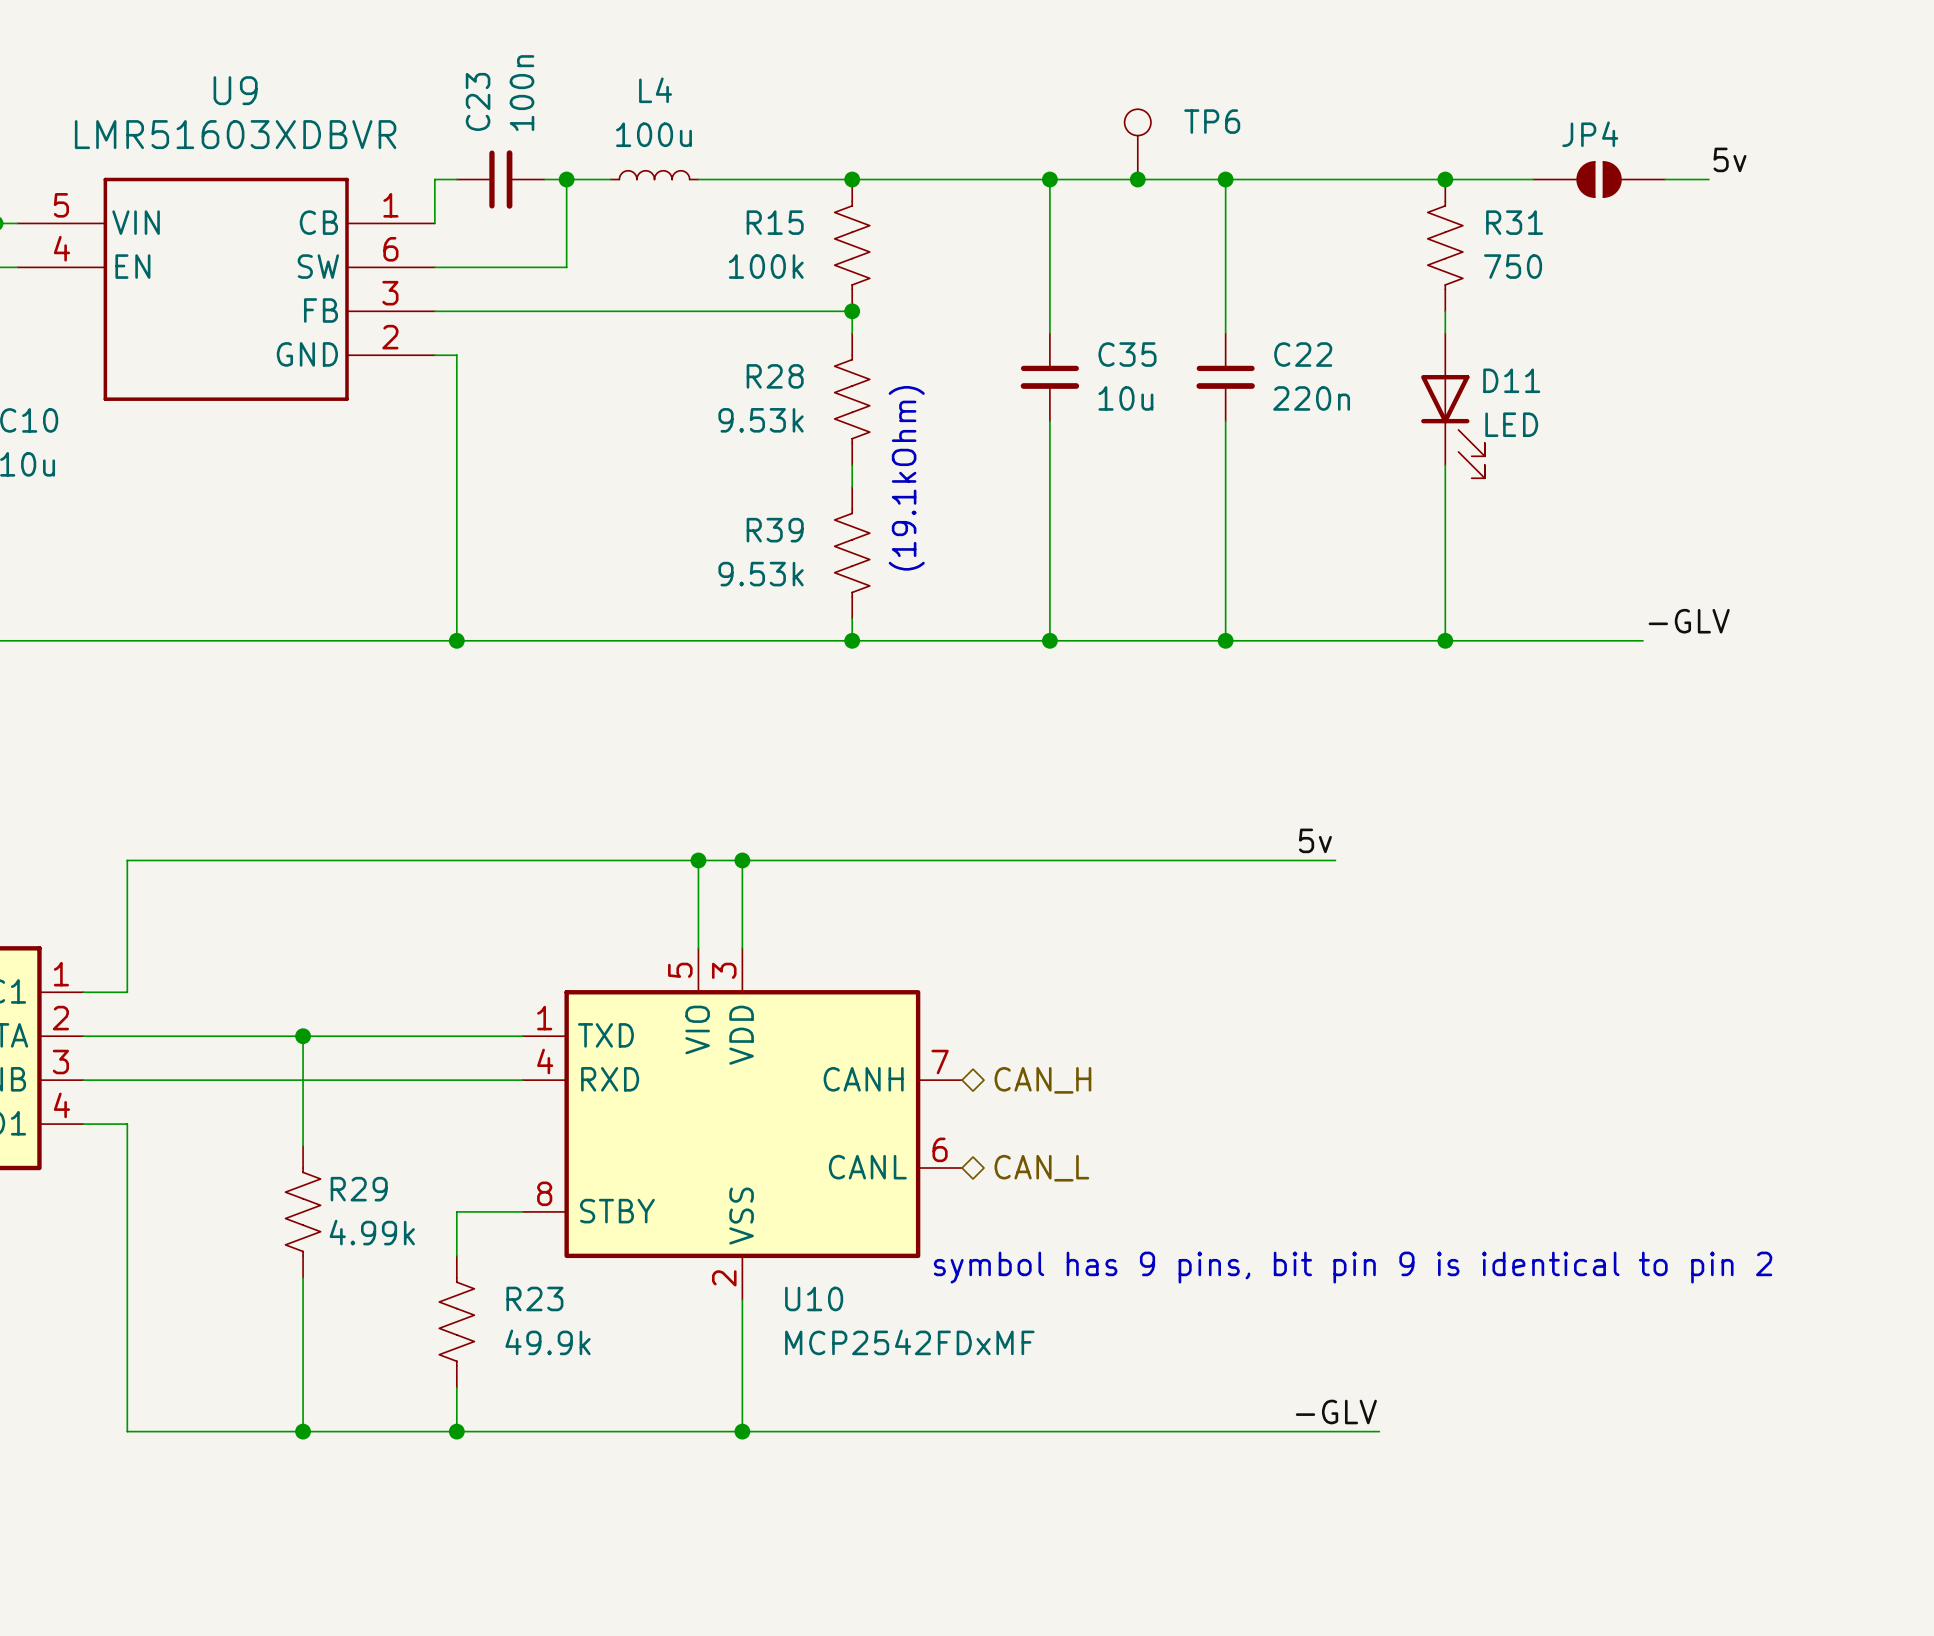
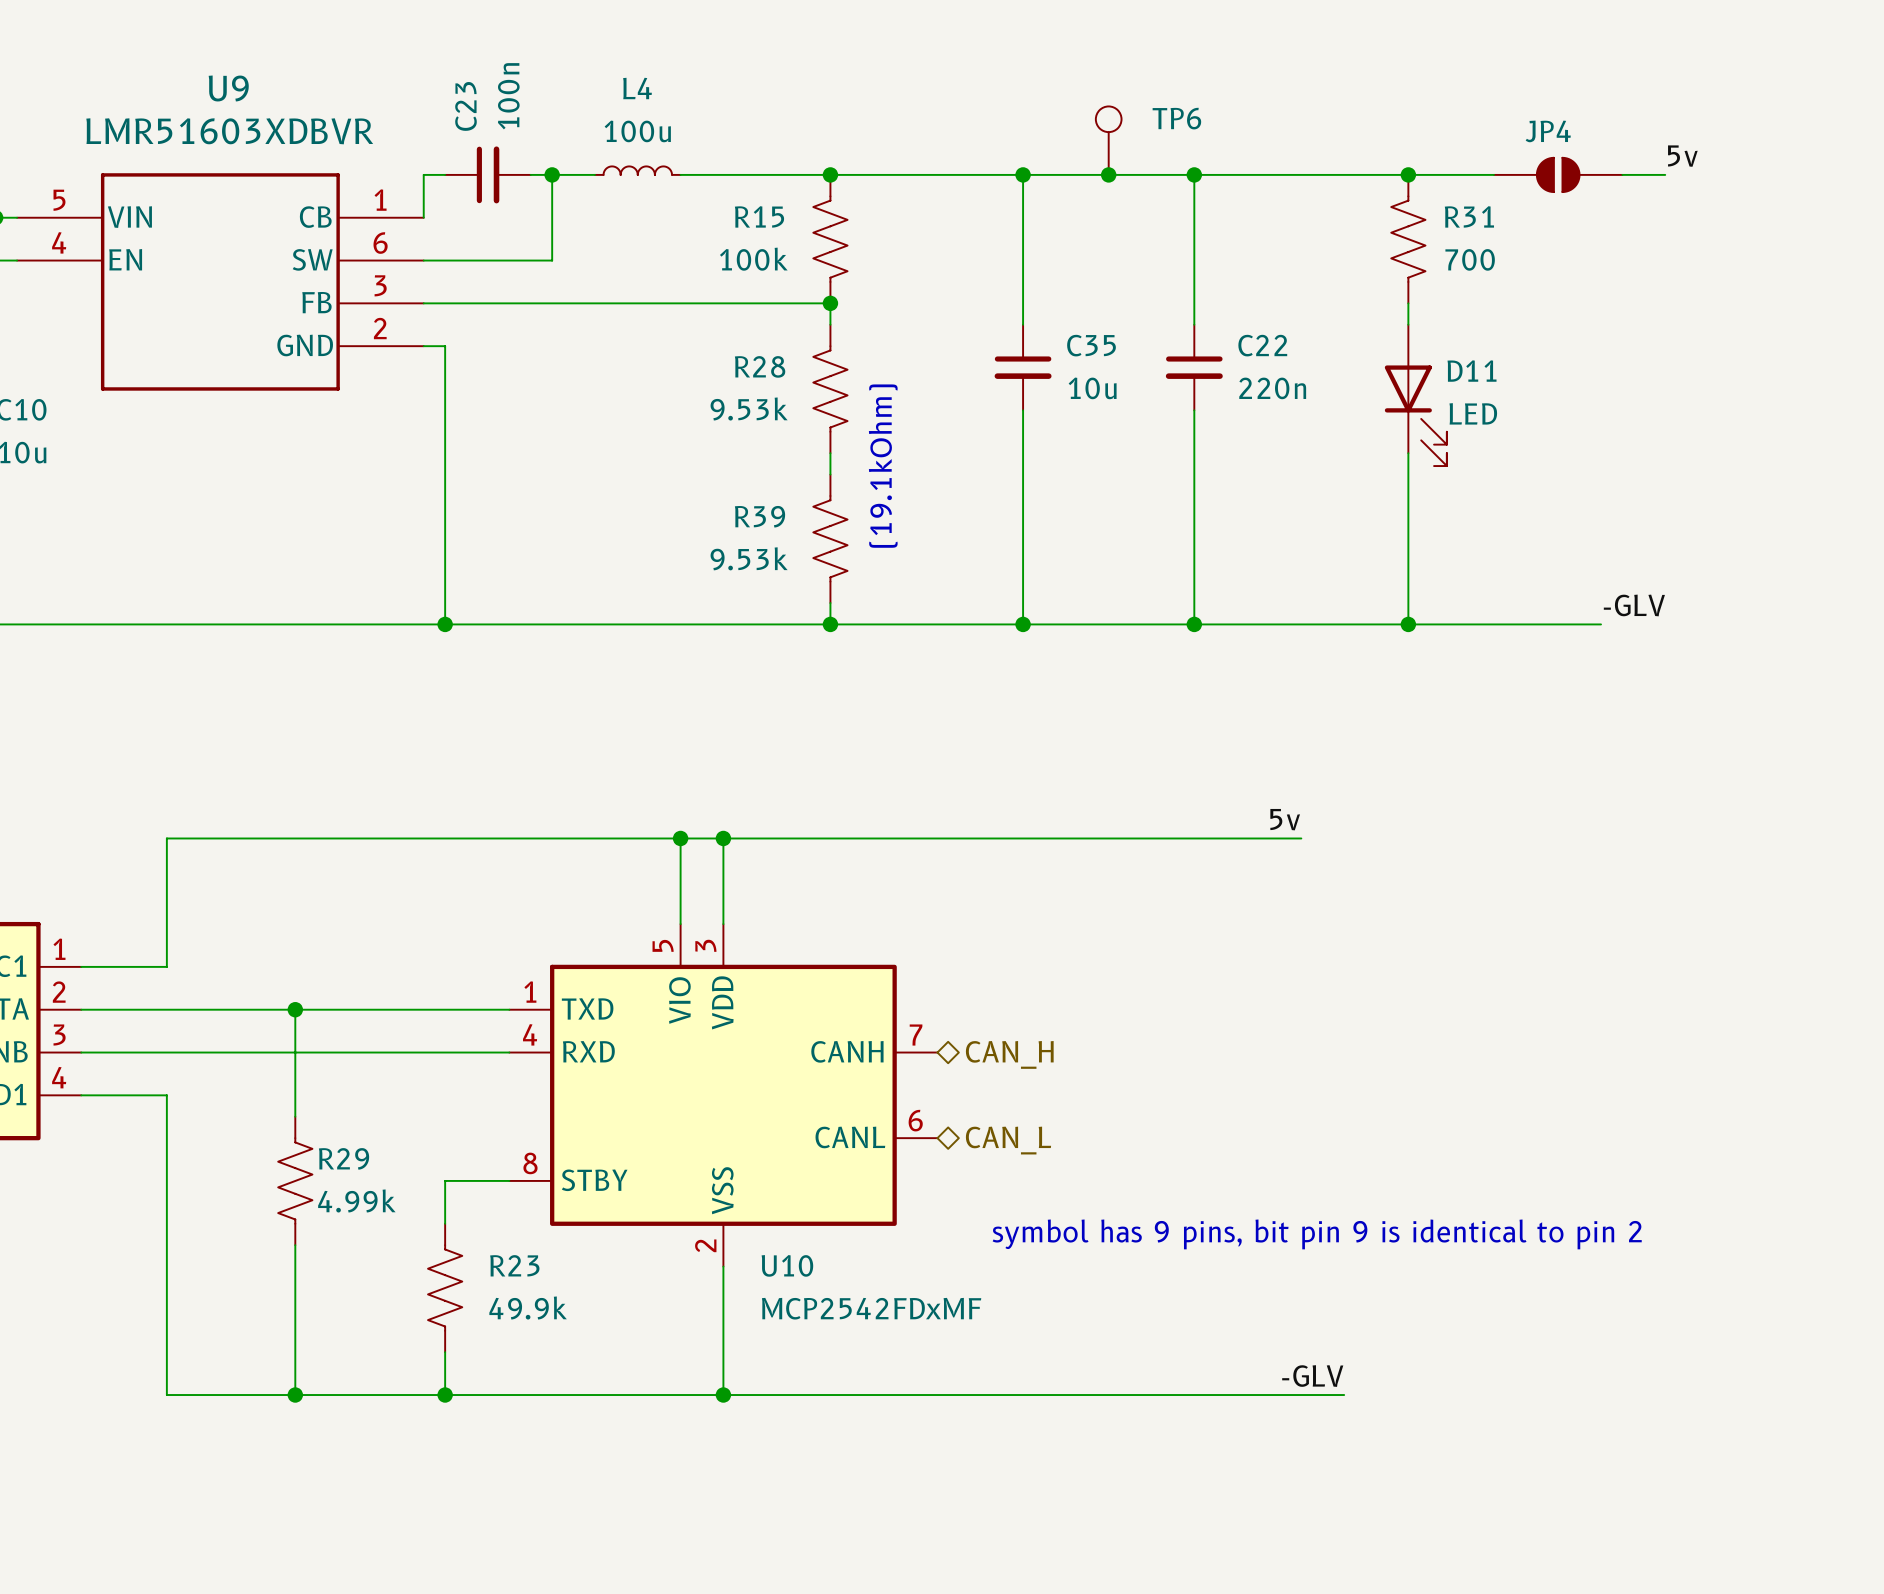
R31 value: 750 (1513, 266) -> 700 (1470, 259)
wire: (171, 860) (127, 860) (127, 992) -> (166, 838) (166, 966) (124, 966)
wire: (127, 1124) (127, 1431) (171, 1431) -> (124, 1095) (166, 1095) (166, 1395)

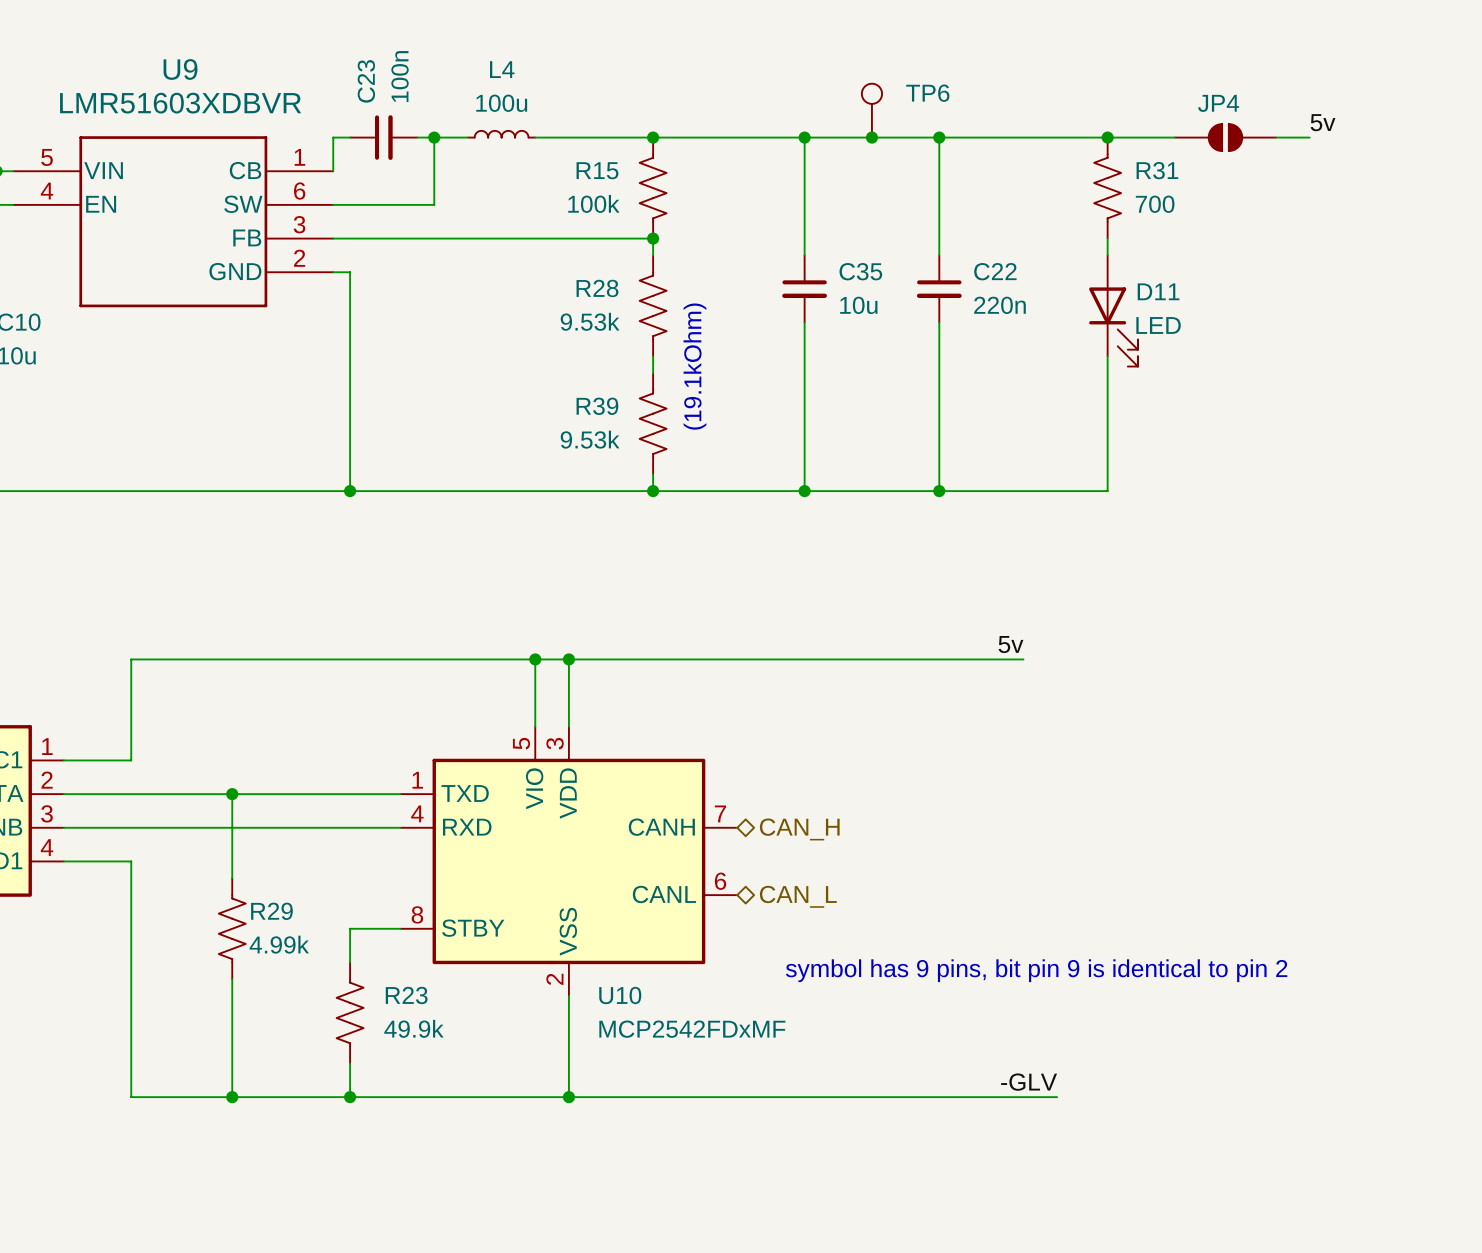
label: -GLV (1634, 605) -> none
wire: (1408, 624) (1601, 624) -> none
junction: (1408, 624) -> none

